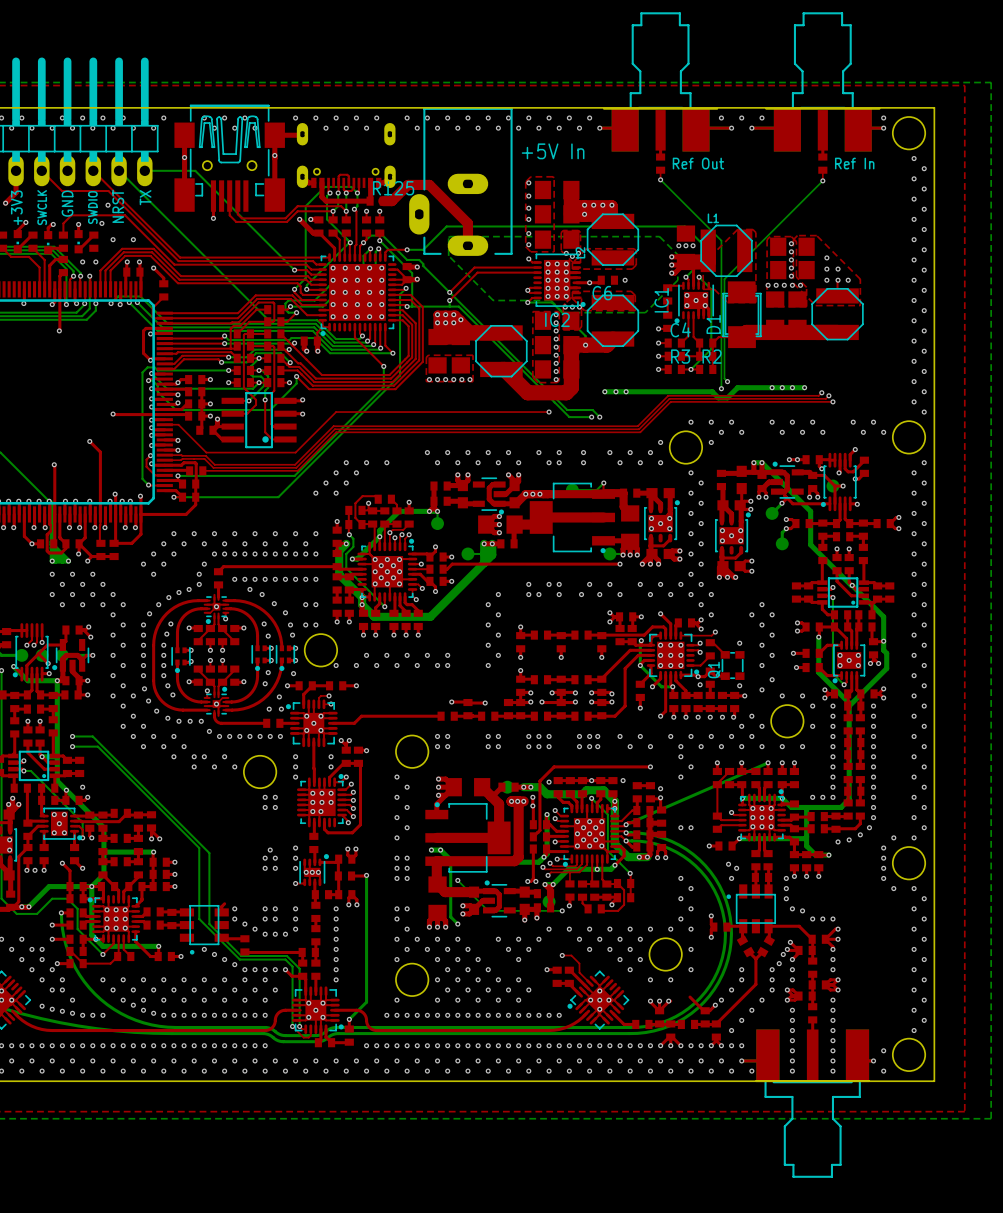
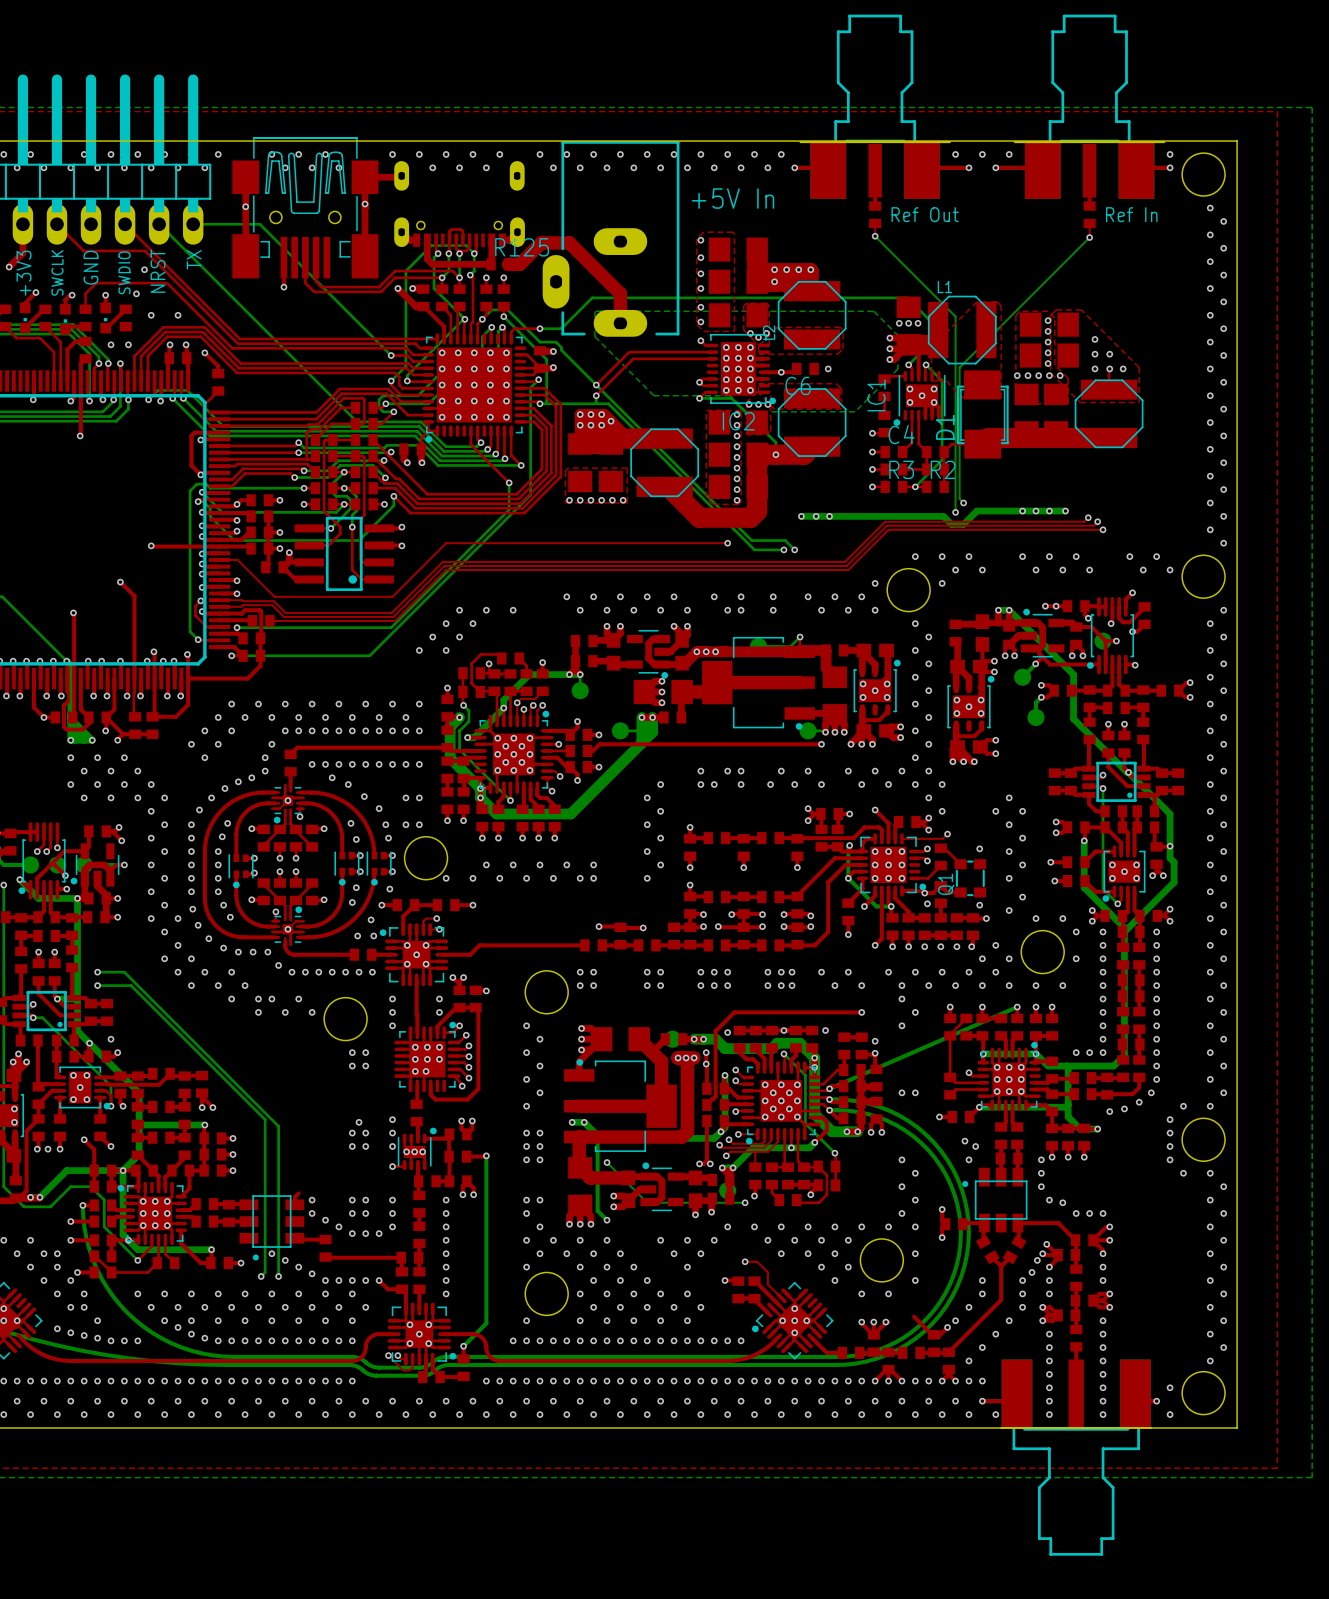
bottom track: (199, 919) (239, 959) (285, 959) (292, 966) (292, 1026) -> (265, 1213) (265, 1272) (261, 1276)
bottom track: (209, 924) (241, 956) (286, 956) (299, 968) (299, 1026) -> (278, 1220) (278, 1276)
via: none -> (261, 1276)
via: none -> (278, 1276)

